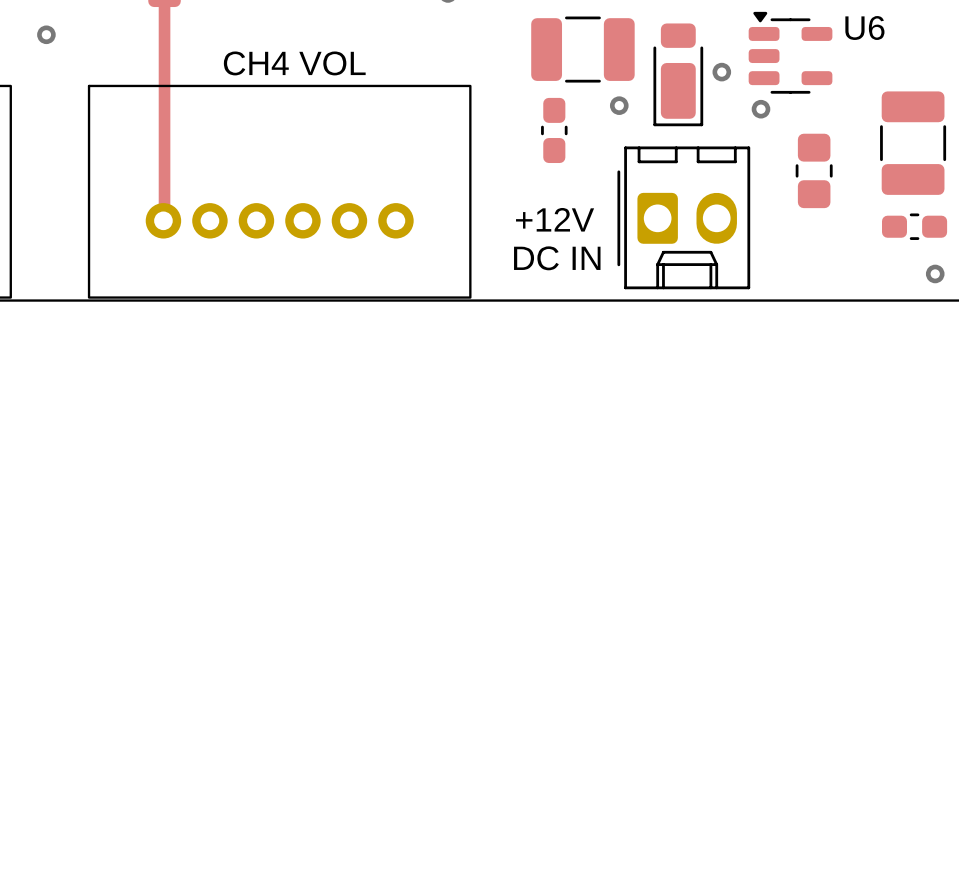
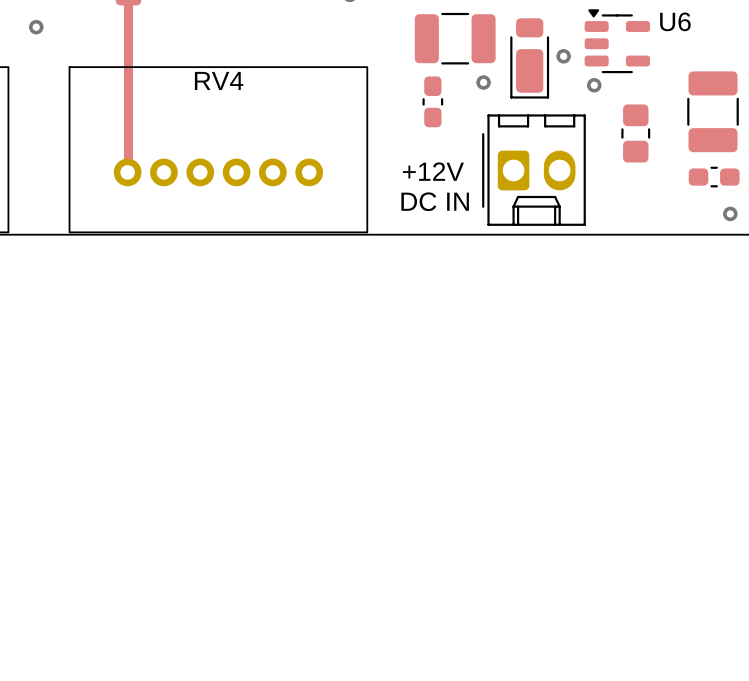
RV4 text: CH4 VOL (294, 63) -> none
RV4 name: none -> RV4 (219, 80)

